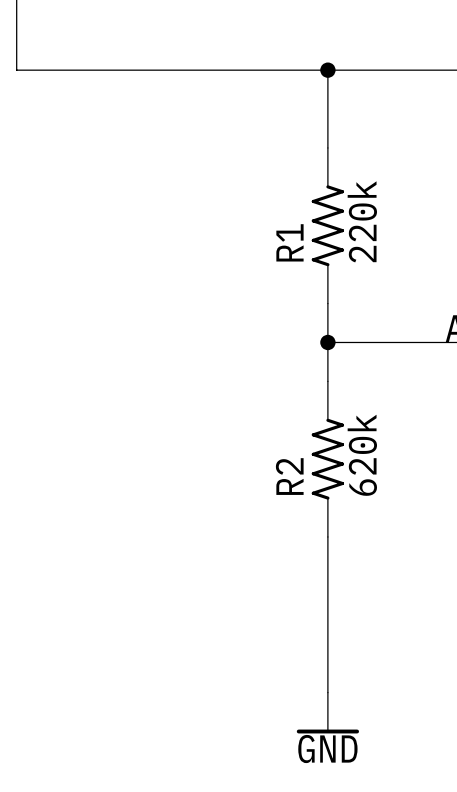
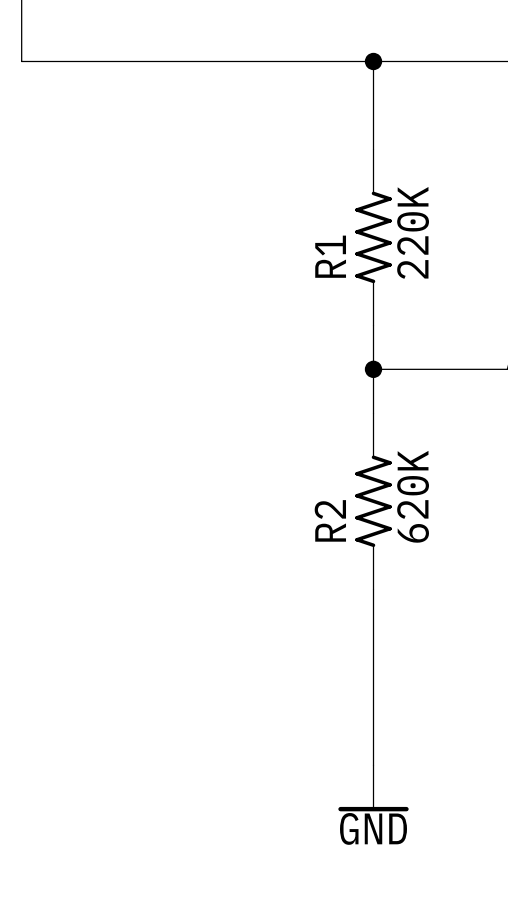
R1 value: 220k (362, 221) -> 220K (413, 232)
R2 value: 620k (362, 455) -> 620K (413, 496)

